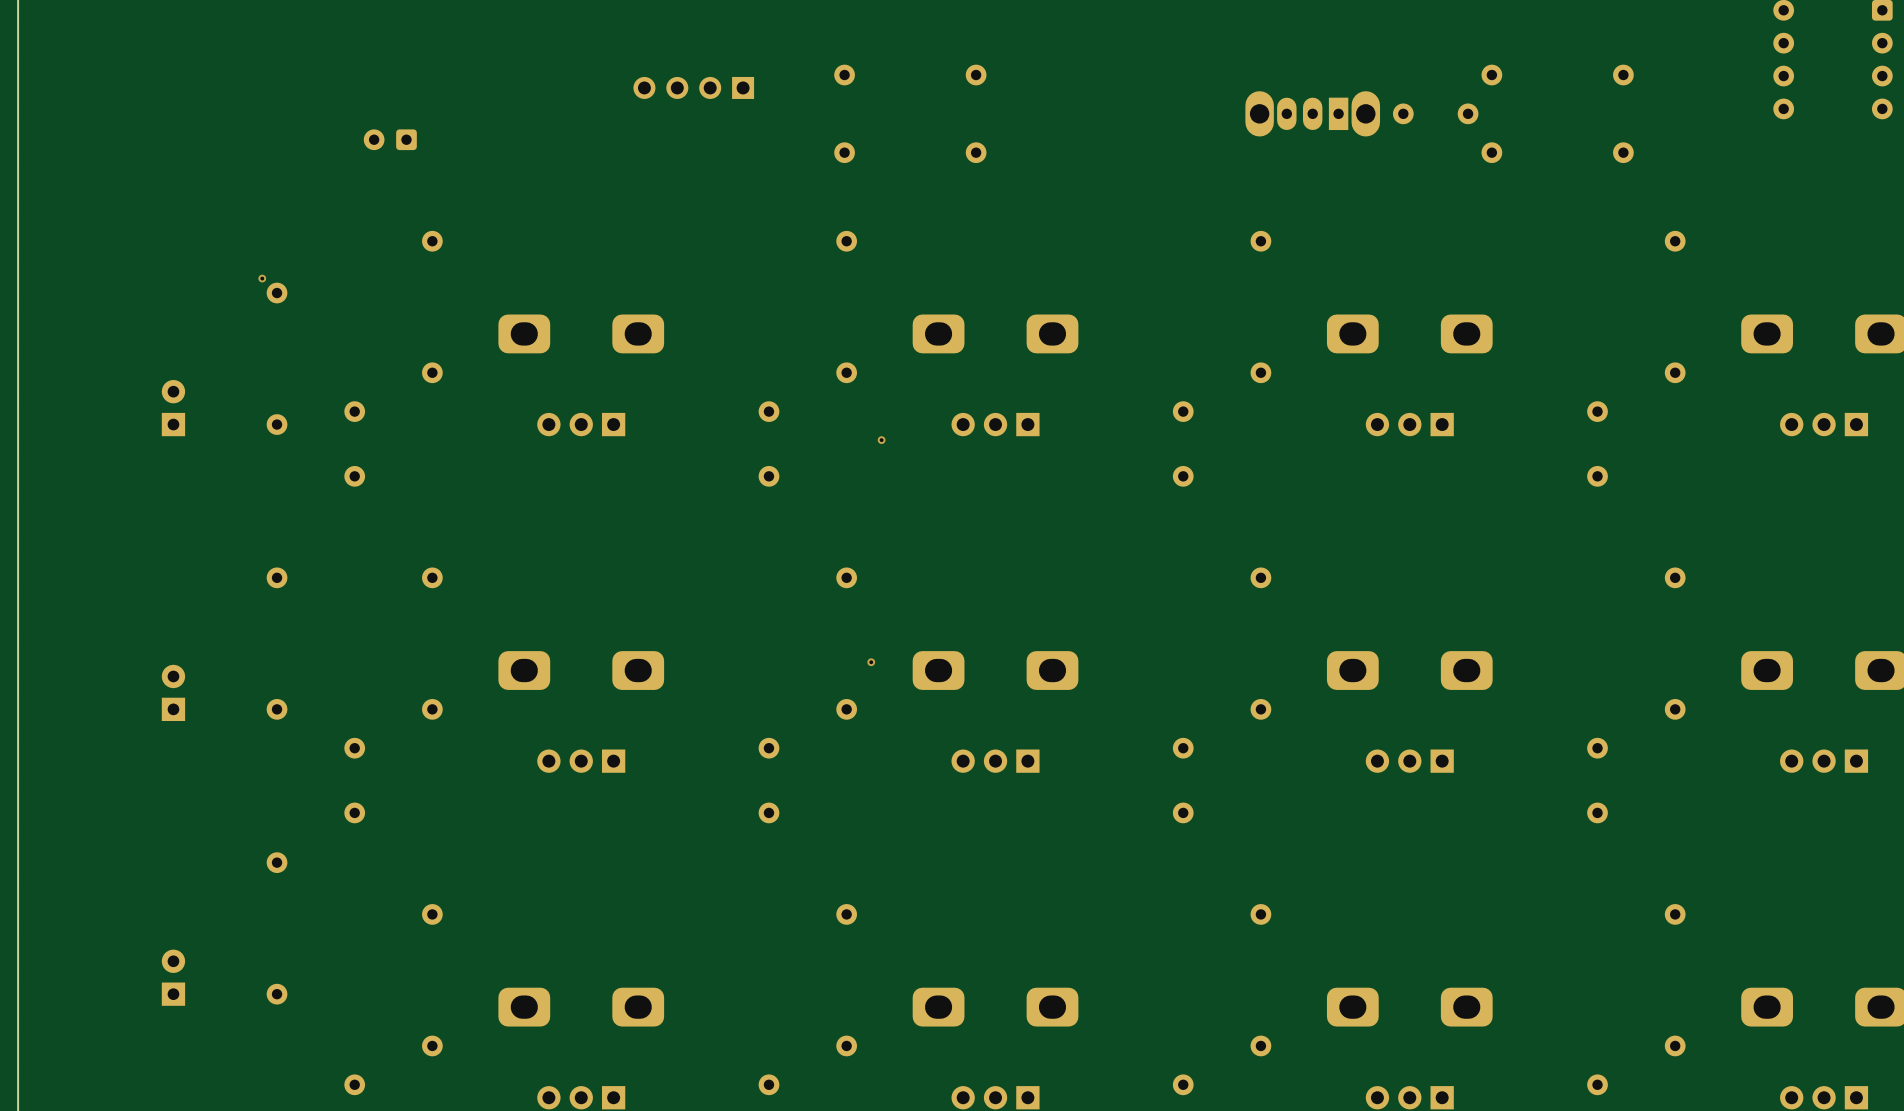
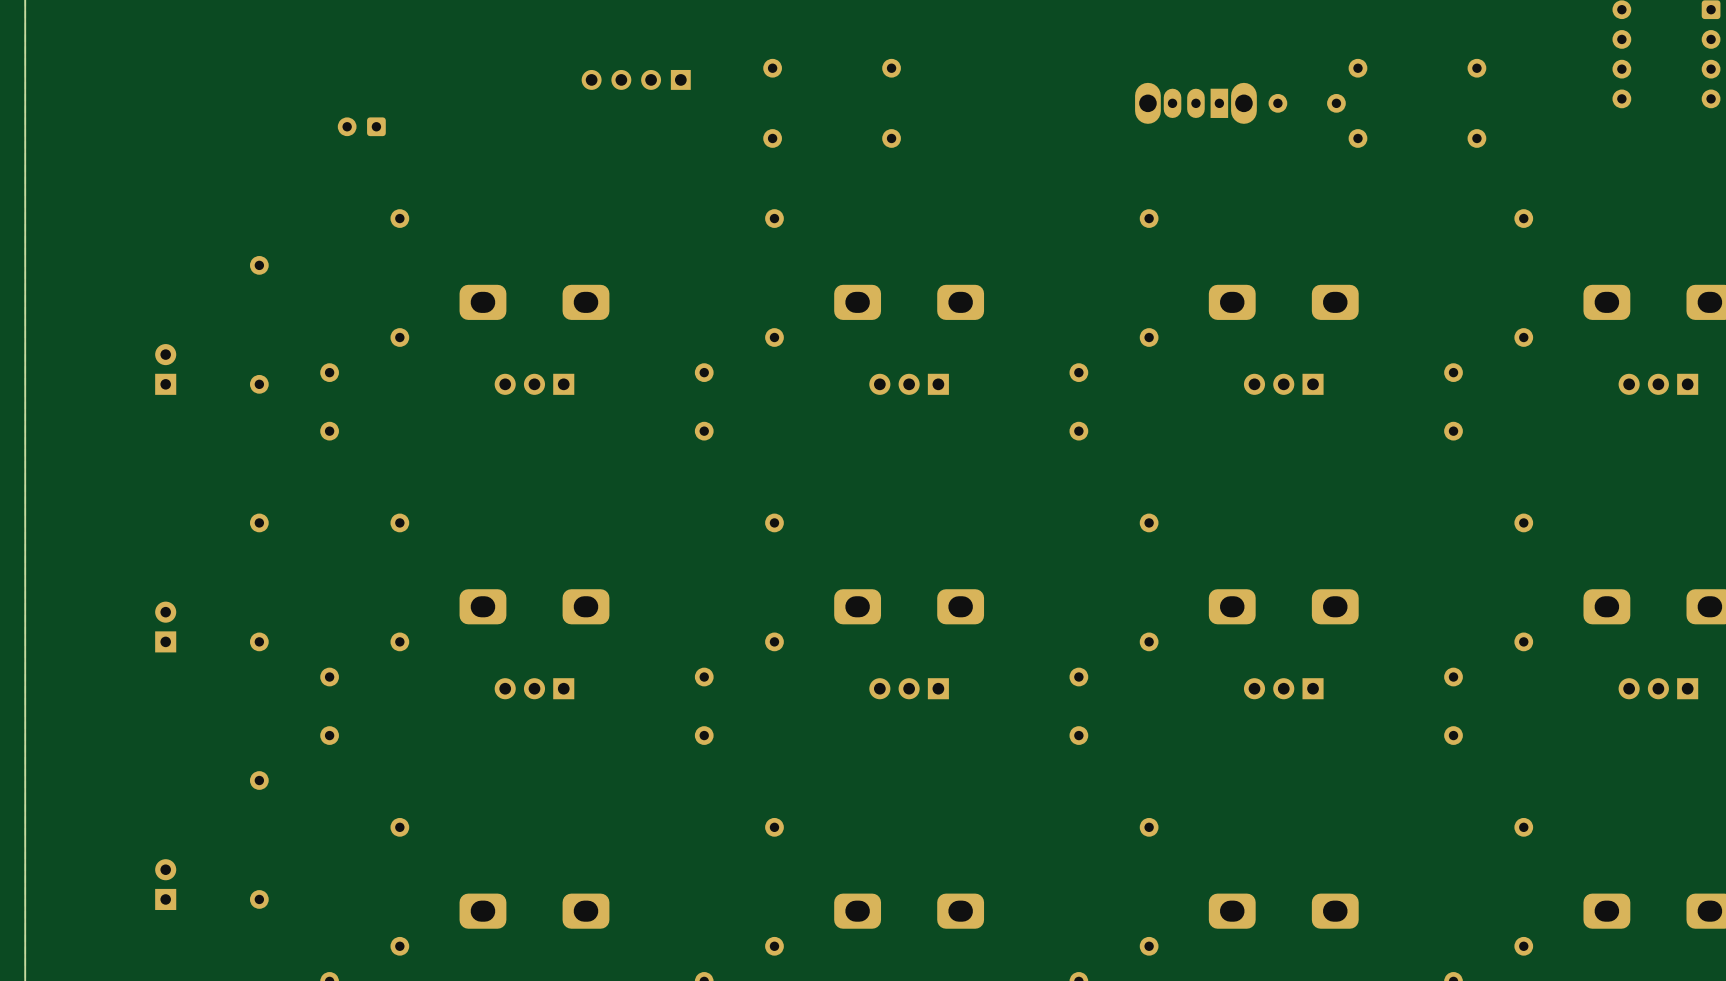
via: (262, 278) -> none
via: (881, 440) -> none
via: (871, 662) -> none

